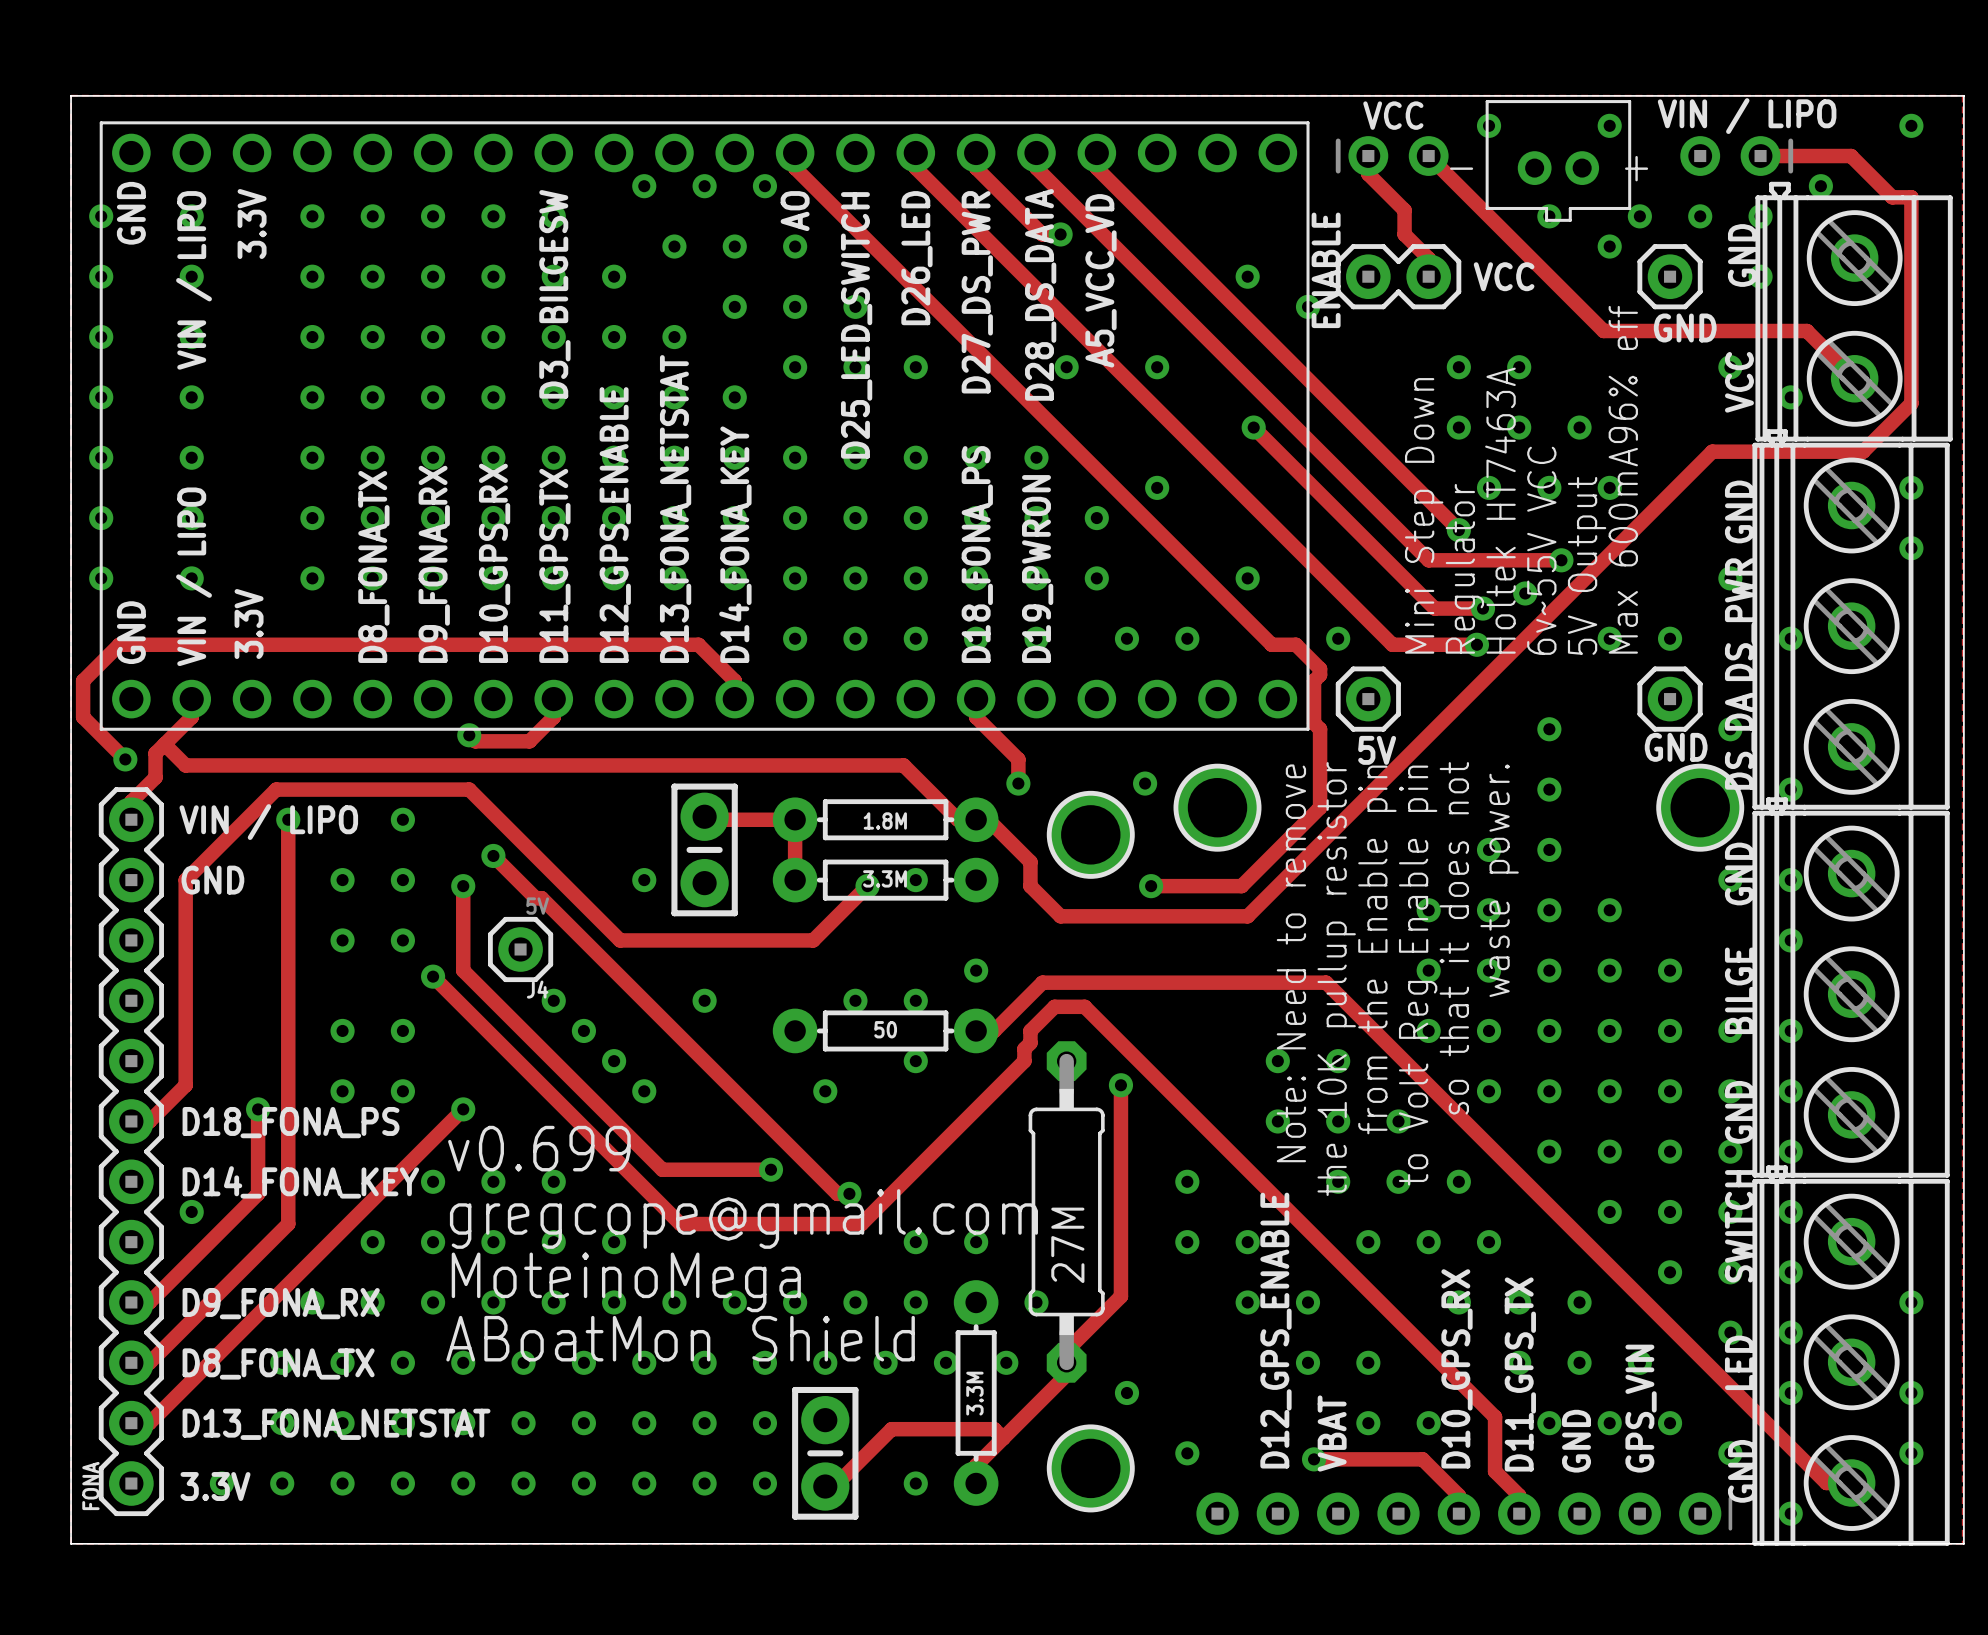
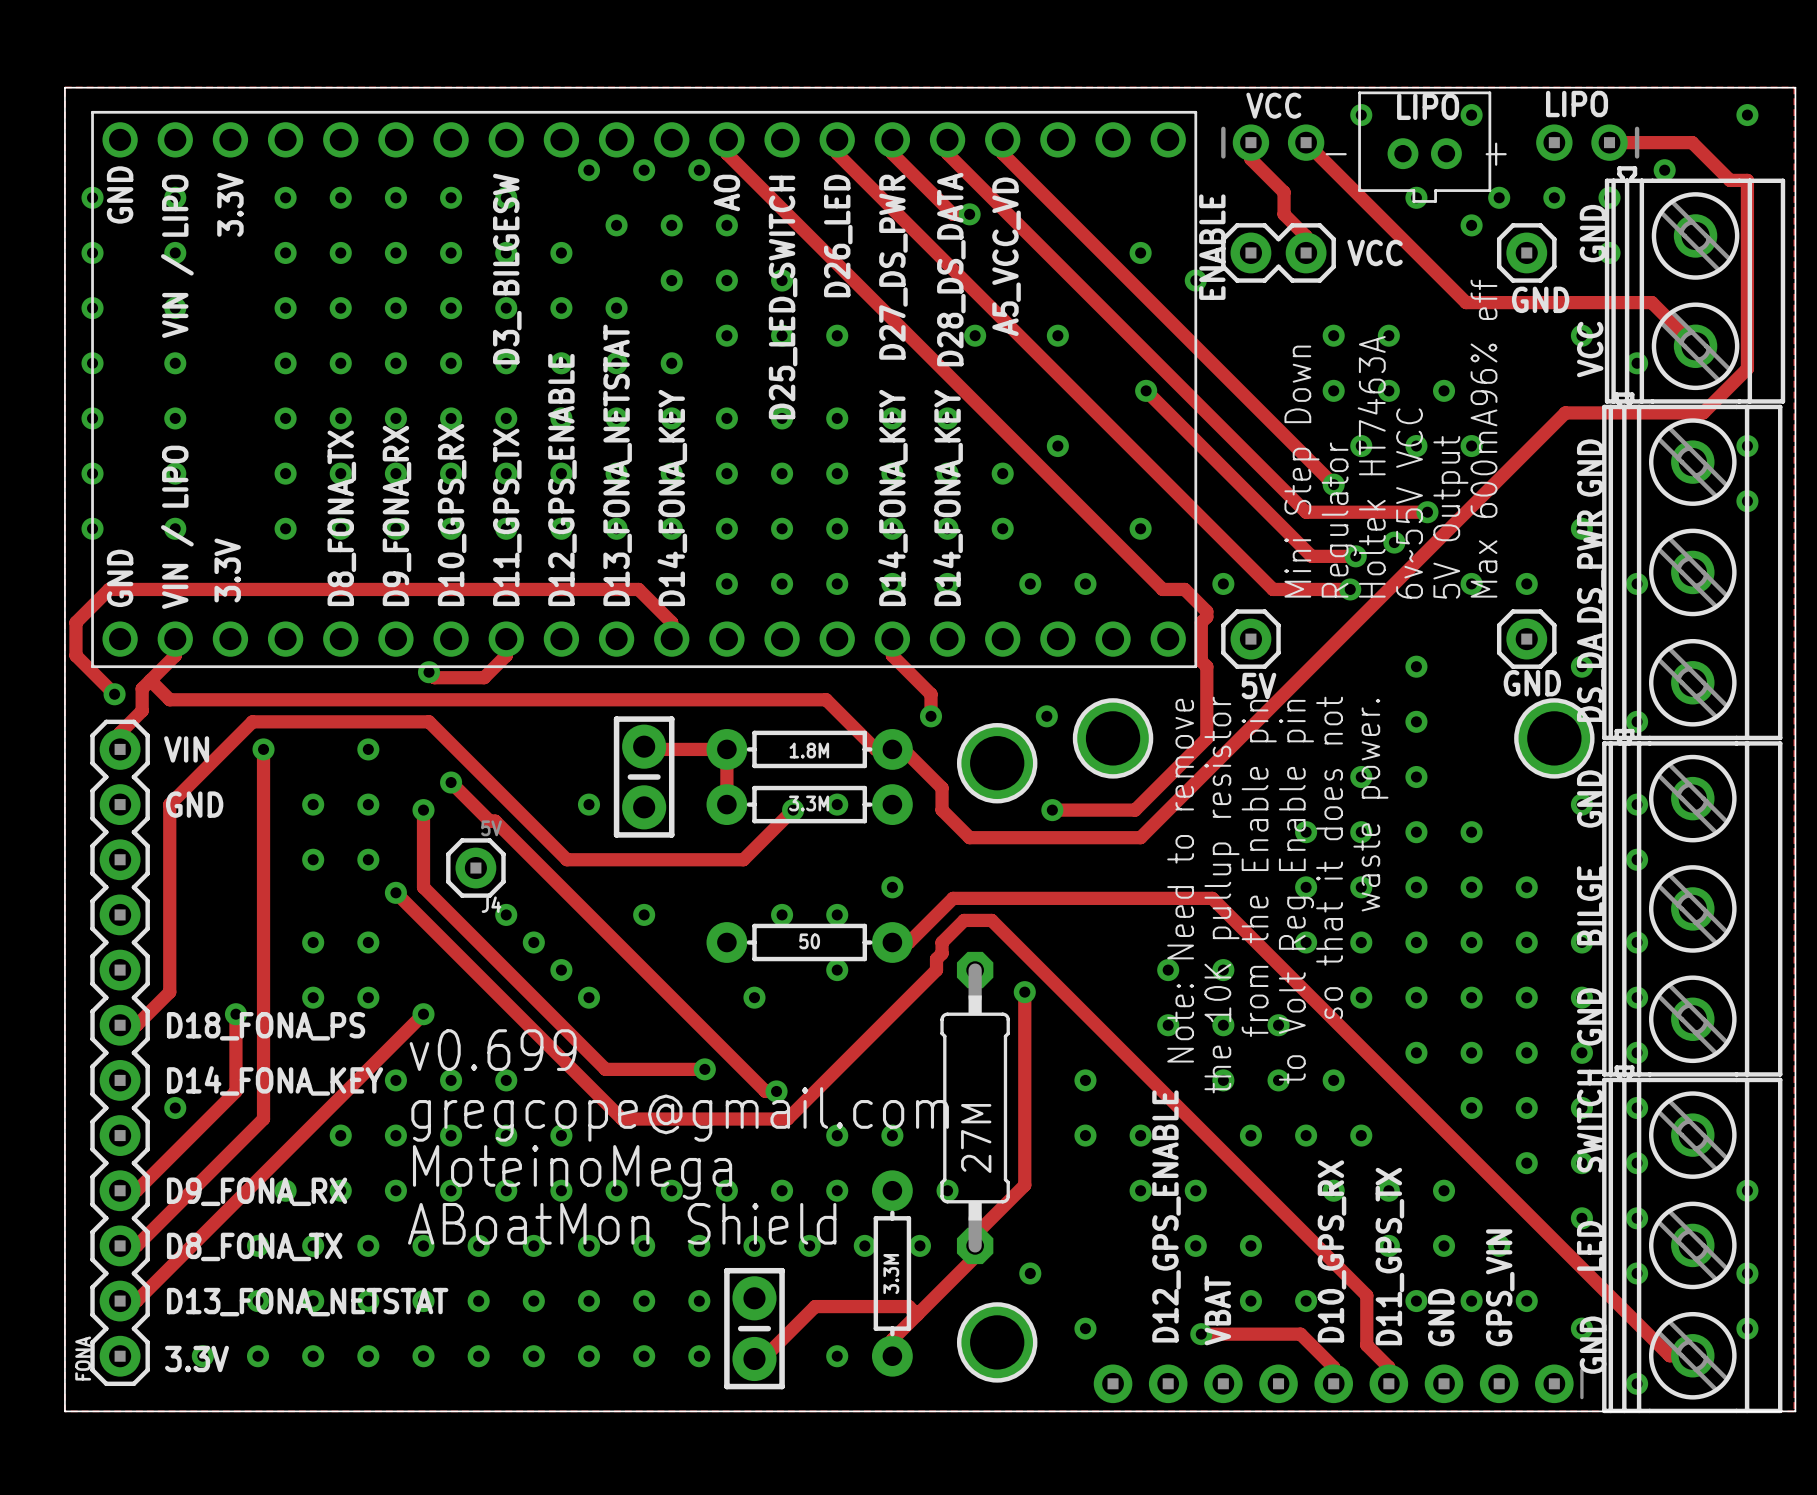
text: none -> LIPO (1577, 104)
text: none -> LIPO (1428, 106)
text: VIN / LIPO (1747, 116) -> none
text: D18_FONA_PS (977, 554) -> D14_FONA_KEY (892, 497)
text: D19_PWRON (1037, 569) -> D14_FONA_KEY (948, 497)
text: VIN / LIPO (268, 822) -> VIN (186, 749)

